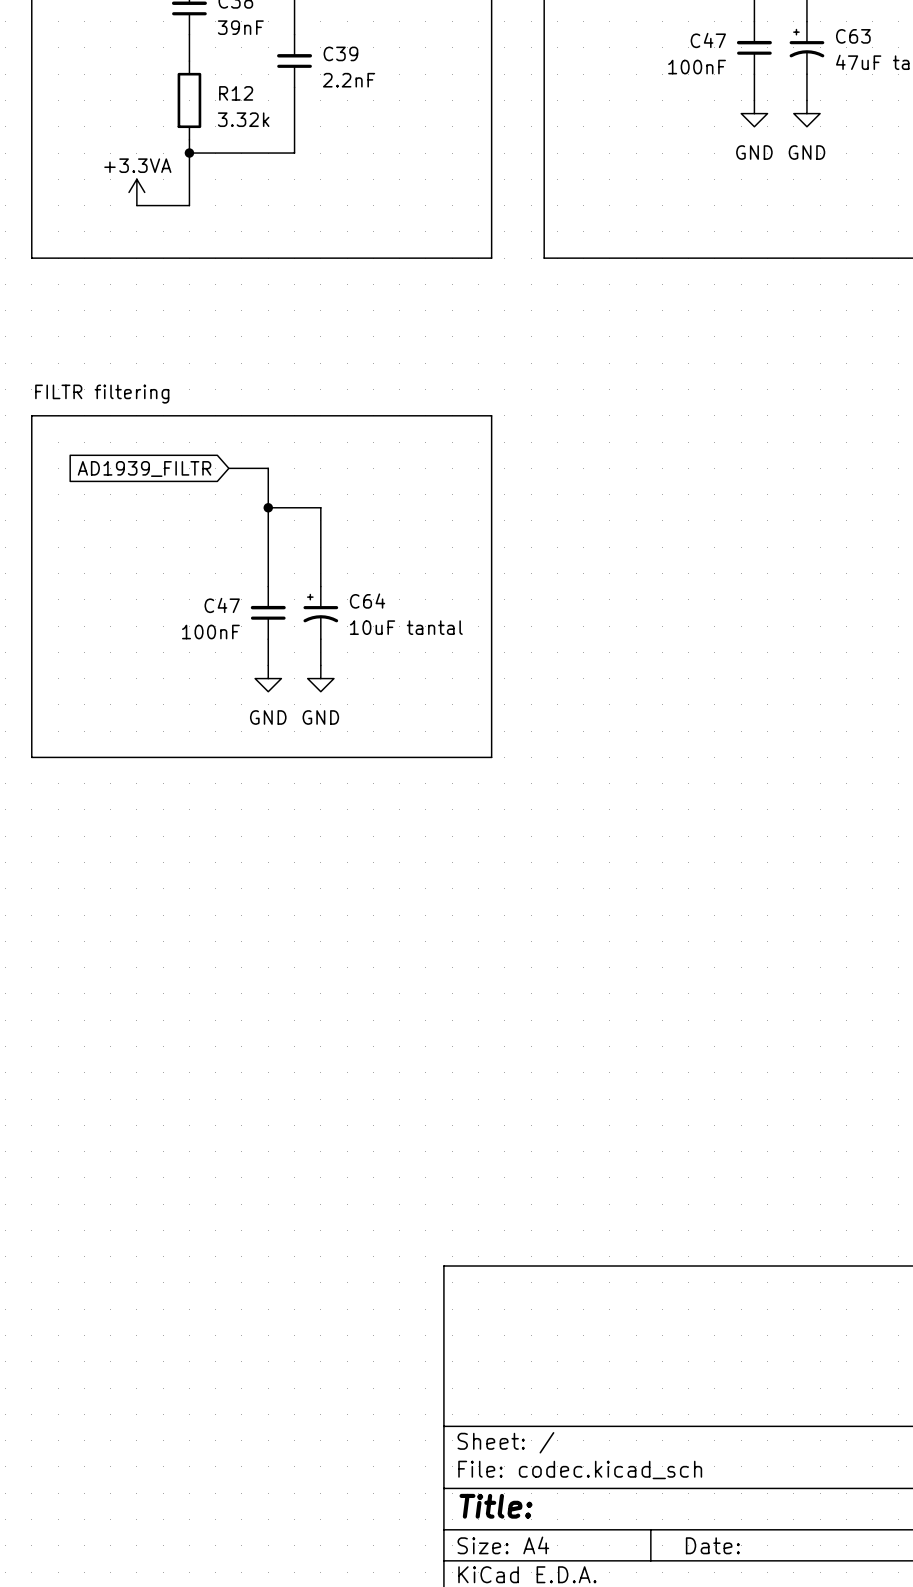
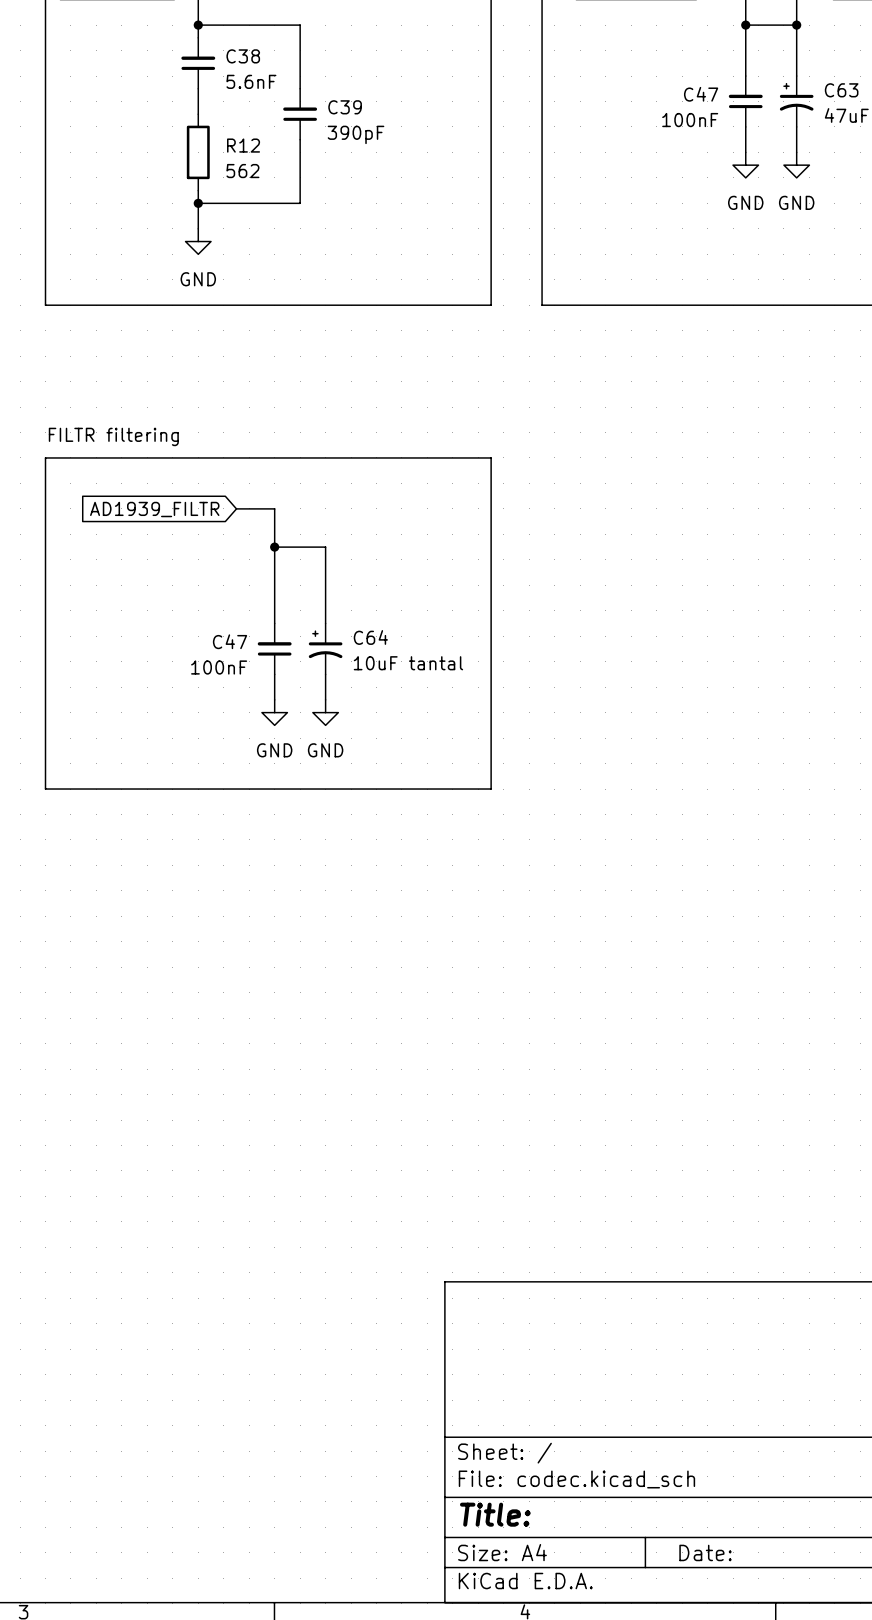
C38 value: 39nF (240, 27) -> 5.6nF (251, 81)
C39 value: 2.2nF (349, 80) -> 390pF (356, 134)
R12 value: 3.32k (243, 119) -> 562 (242, 171)
wire: (189, 179) (189, 205) (136, 205) -> none
power symbol: +3.3VA (136, 192) -> none
power symbol: none -> GND (198, 241)

